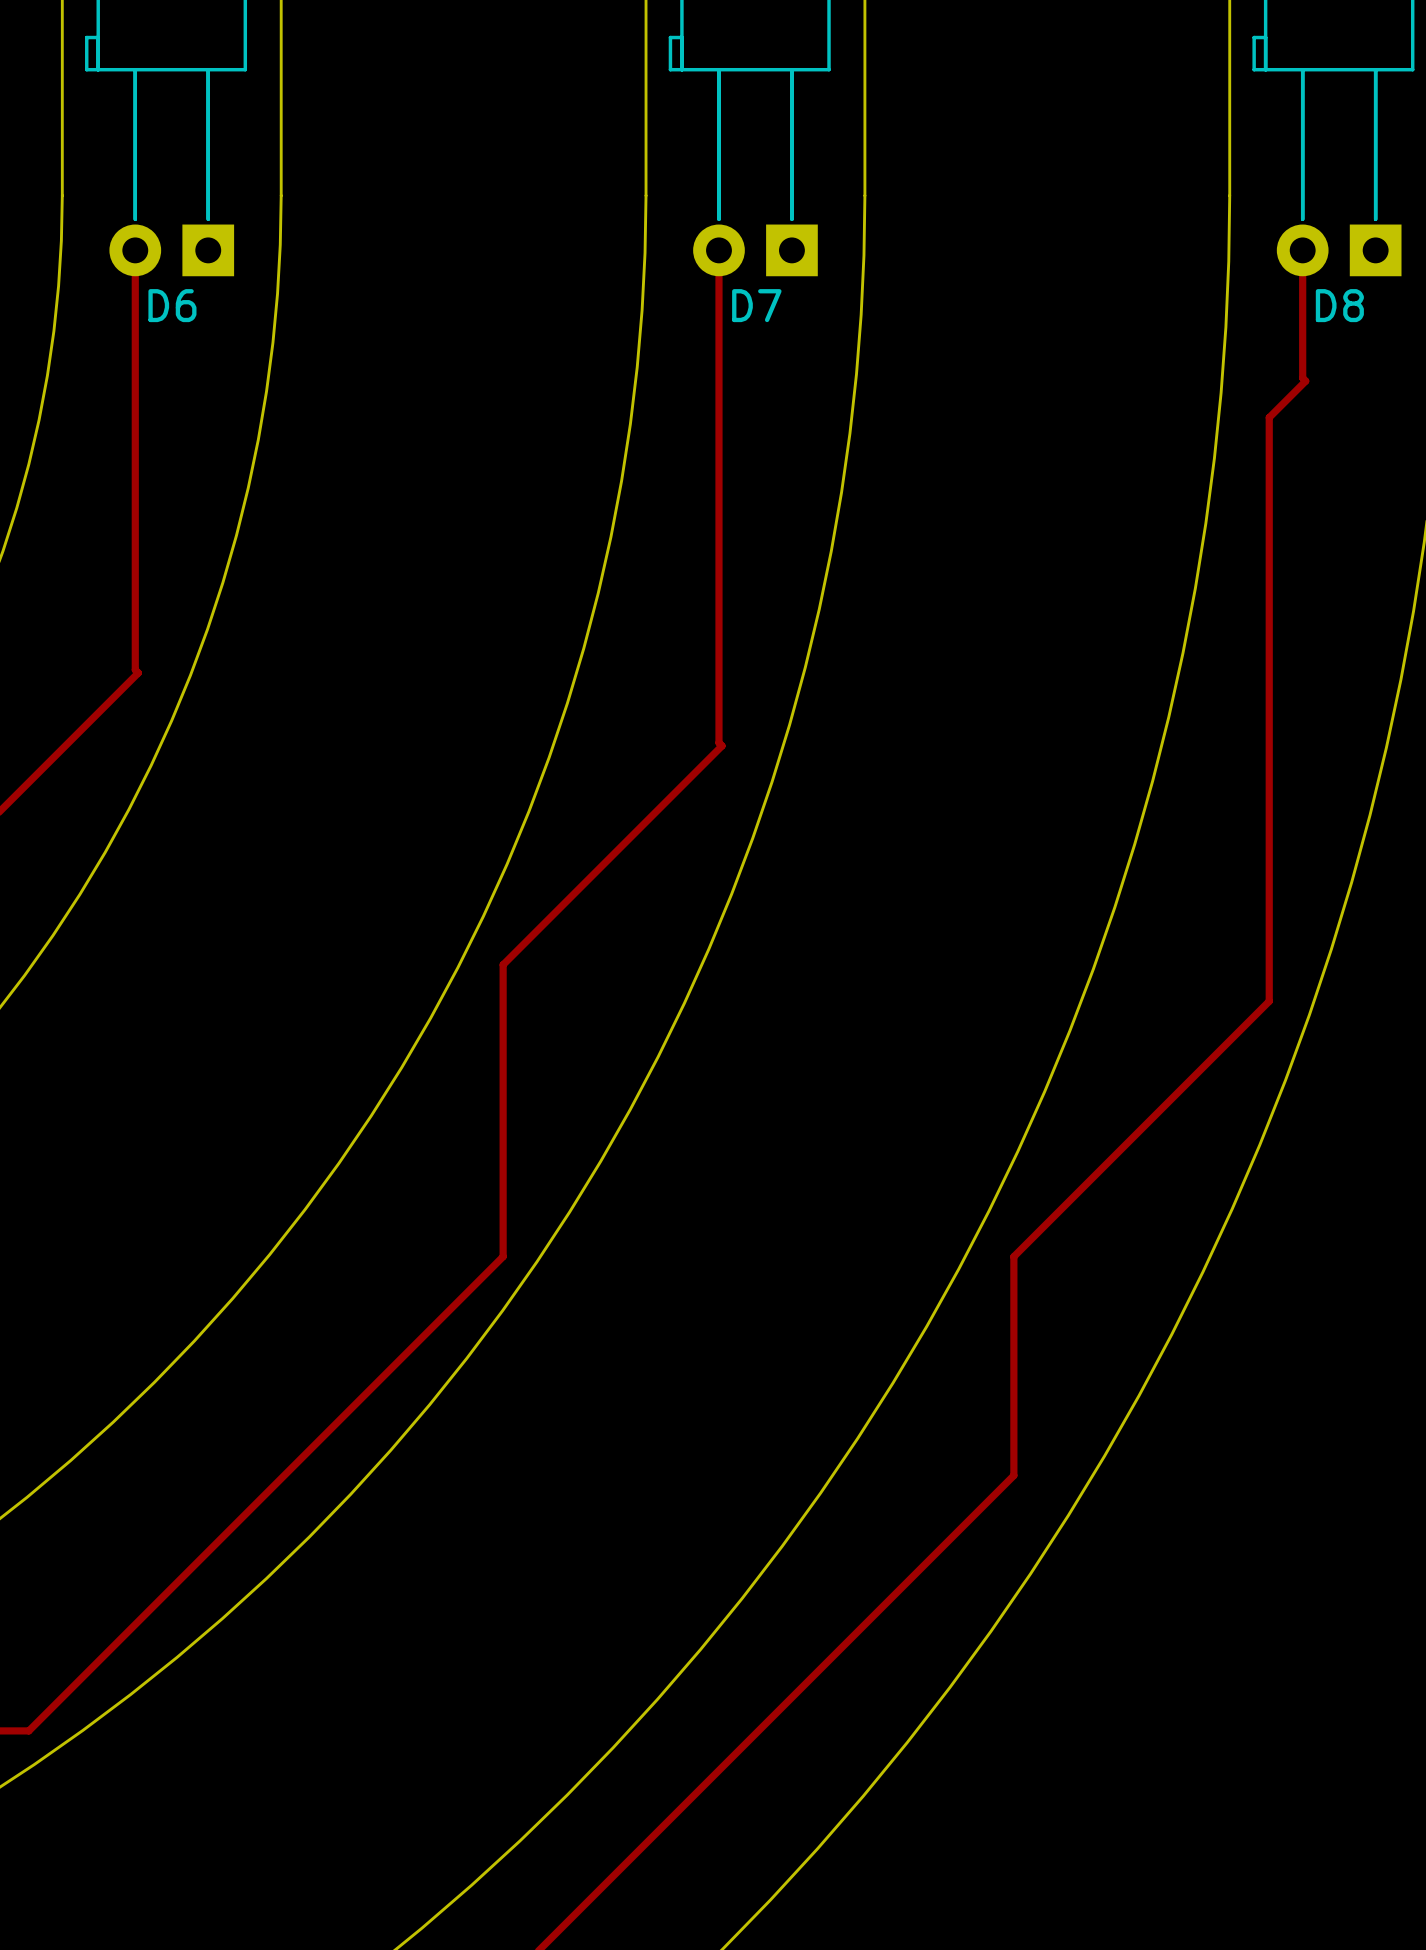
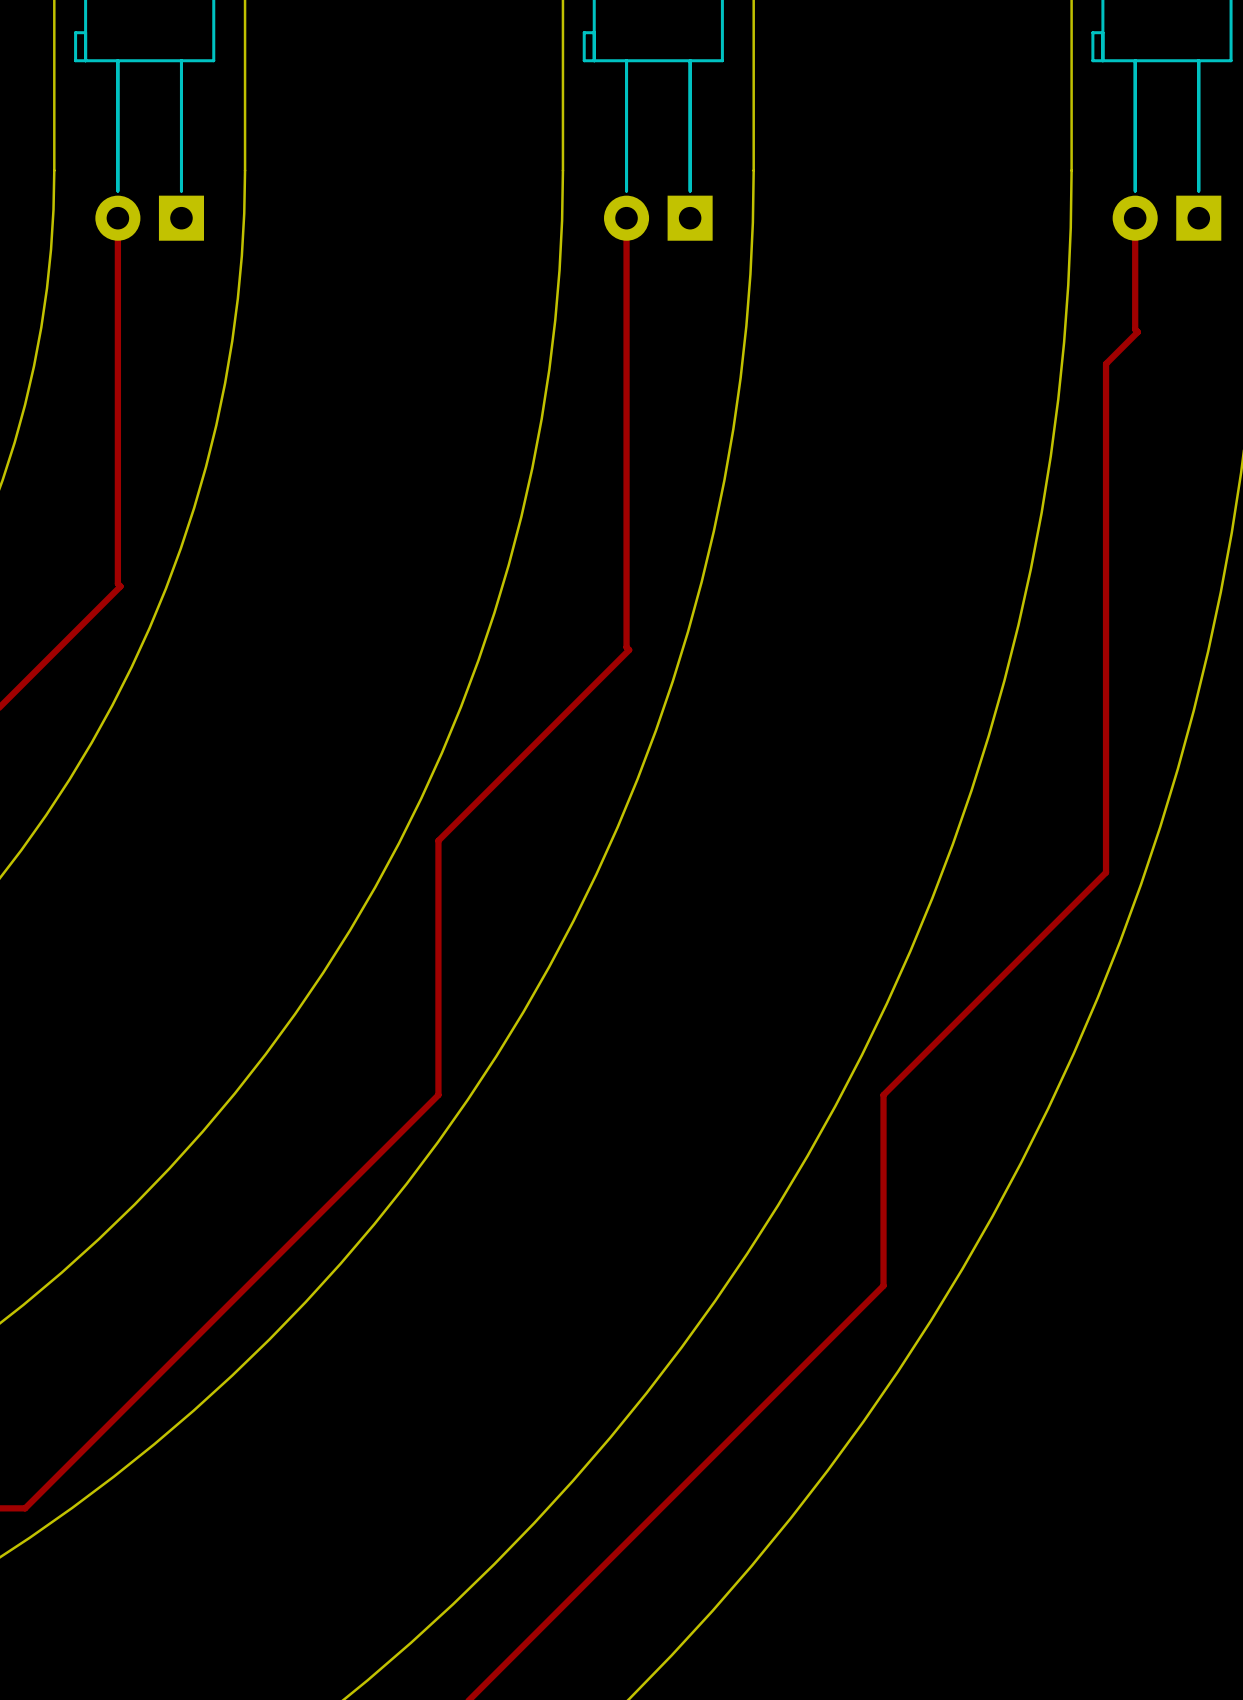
D6 name: D6 (172, 305) -> none
D7 name: D7 (756, 305) -> none
D8 name: D8 (1339, 305) -> none

